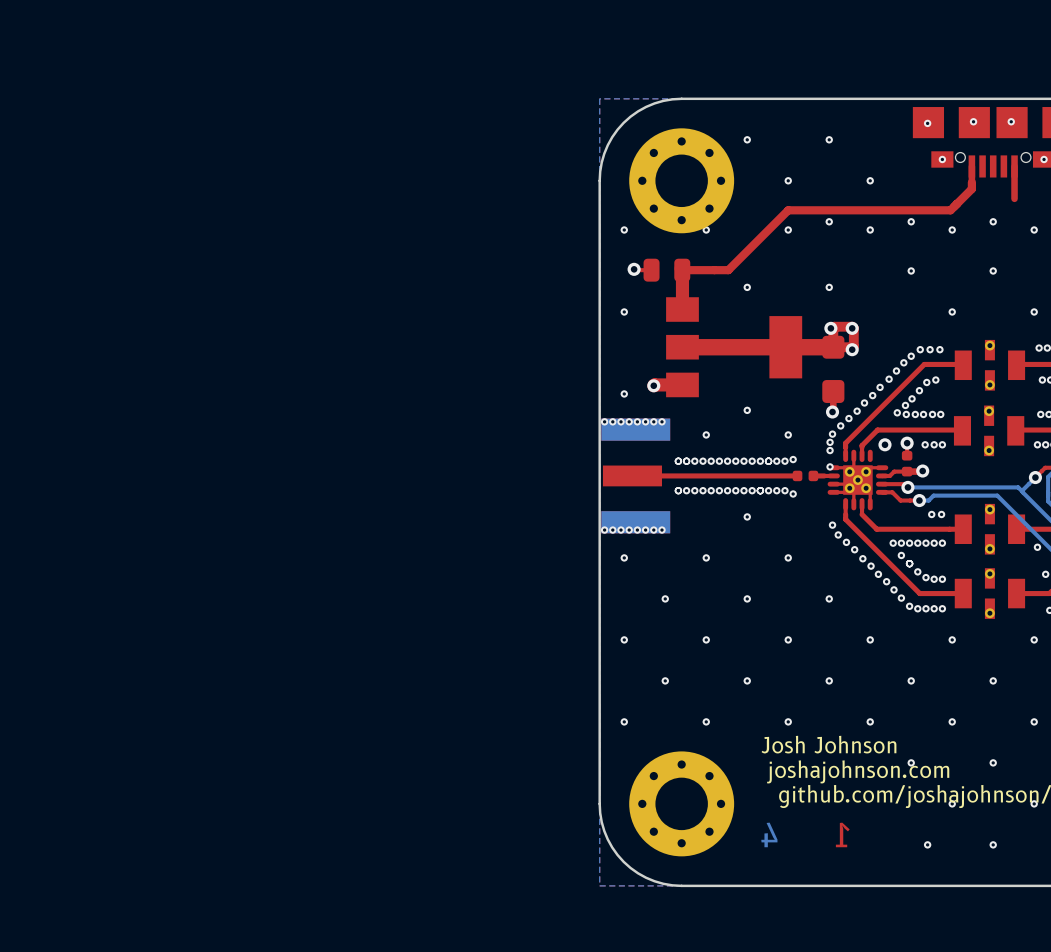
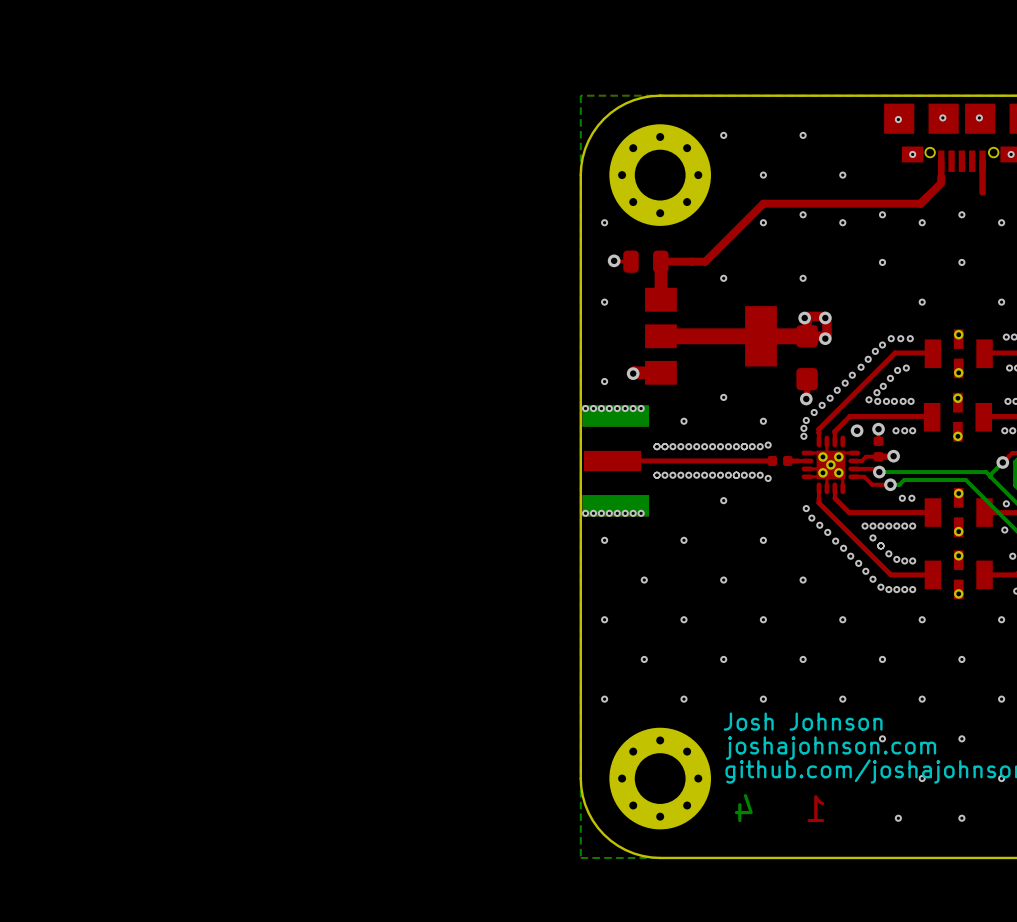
via: (706, 229) -> none
via: (830, 466) -> none
via: none -> (1006, 503)

